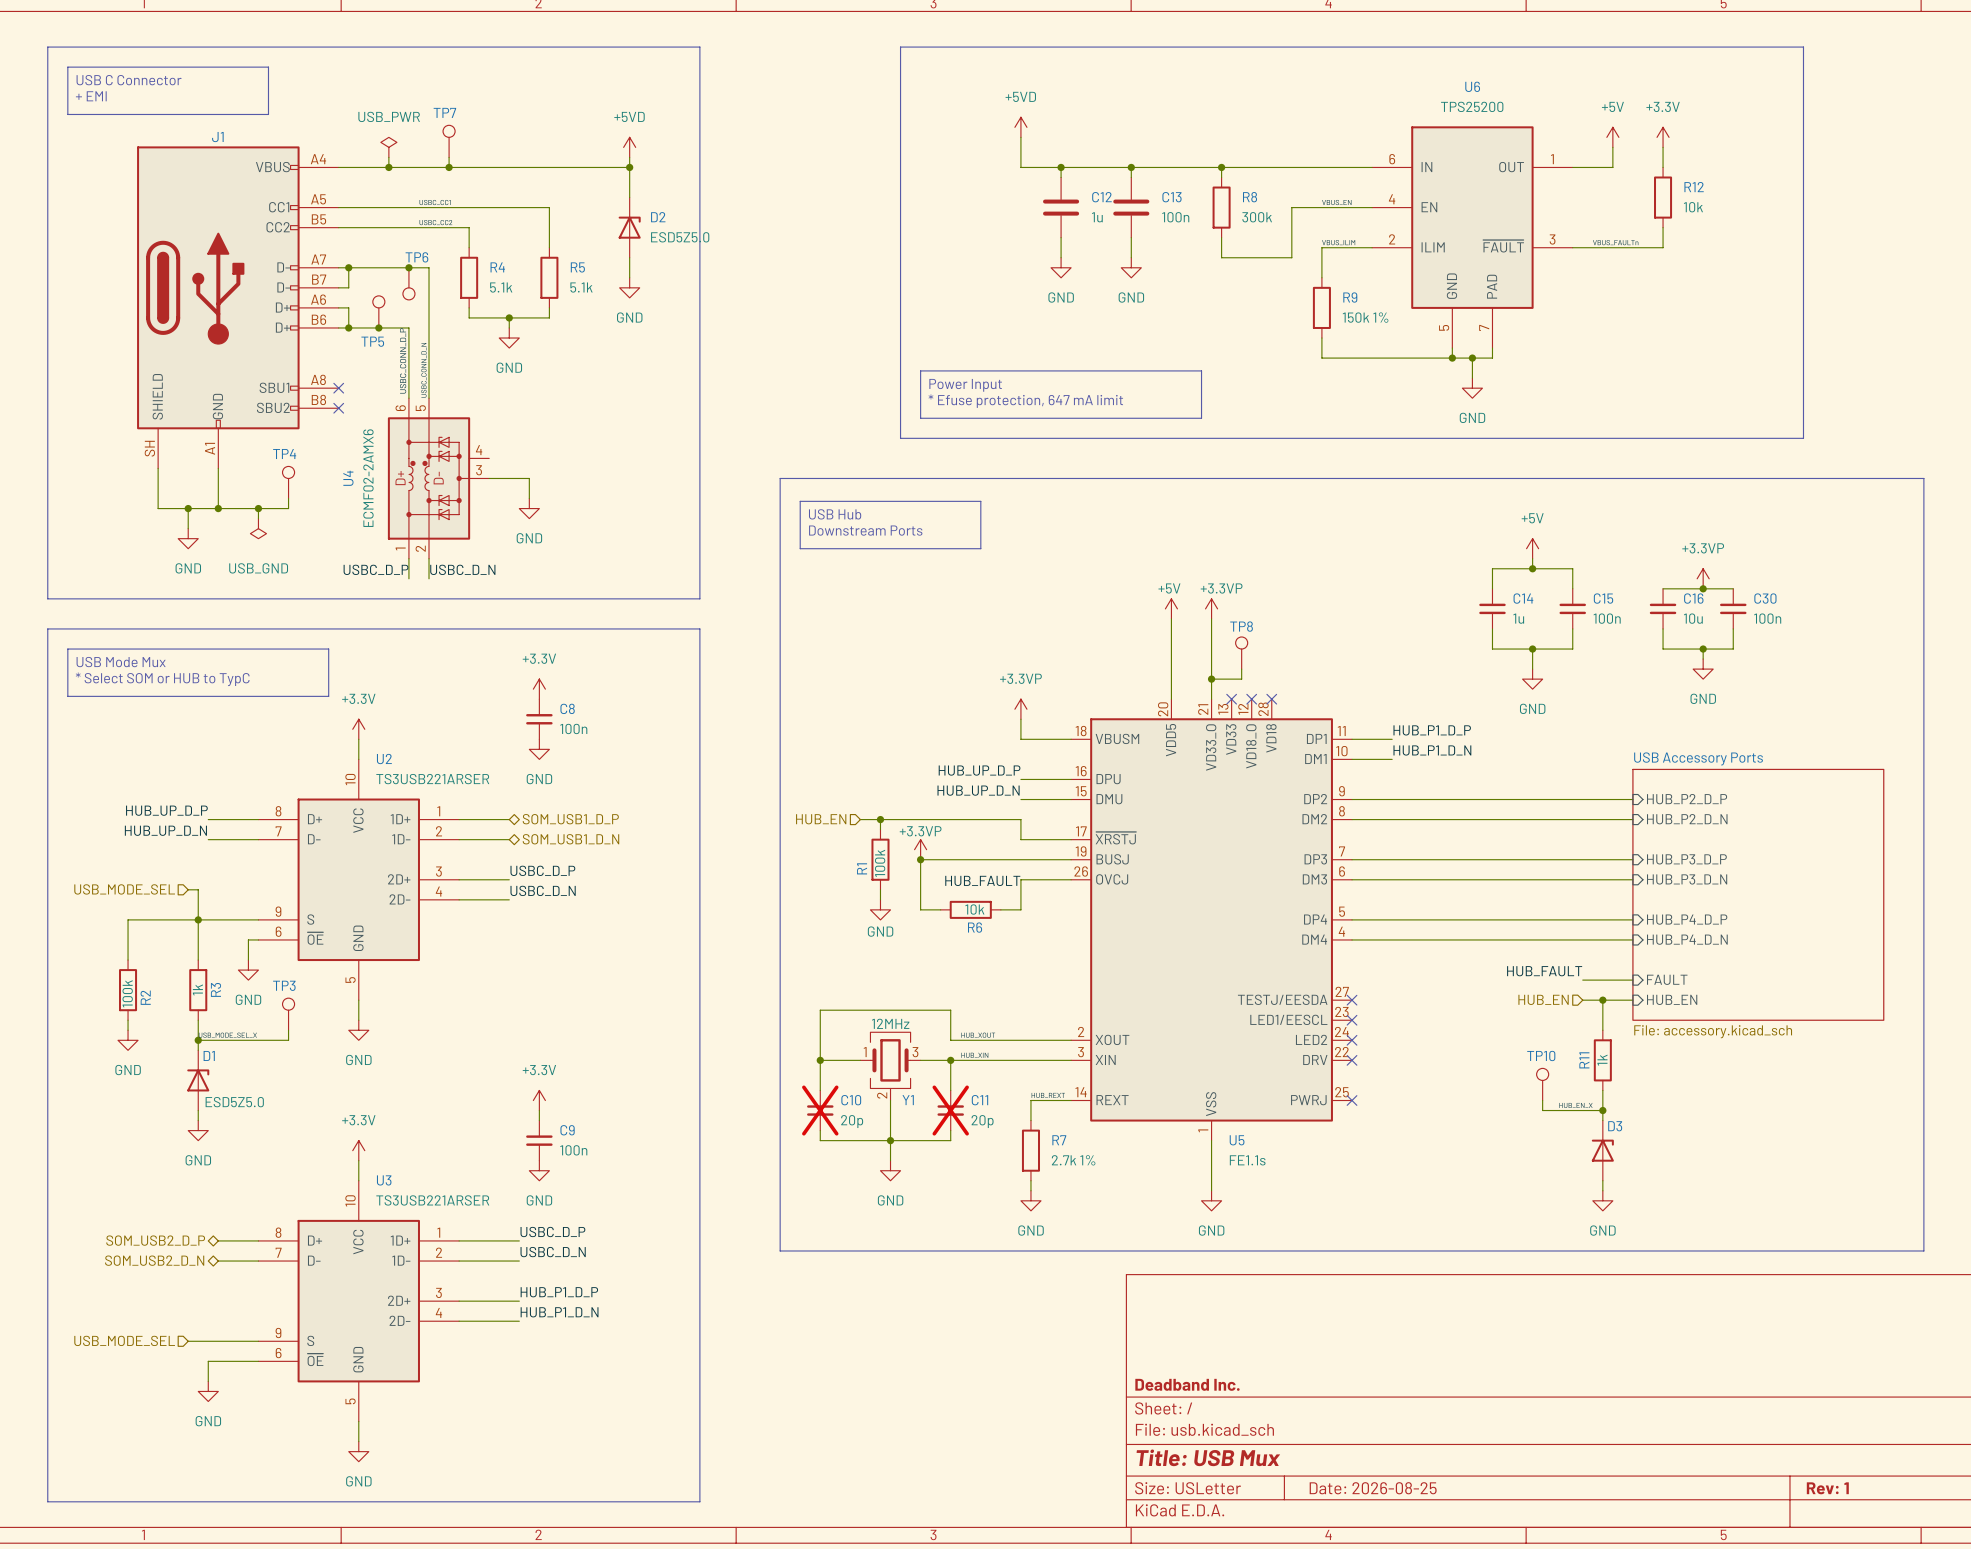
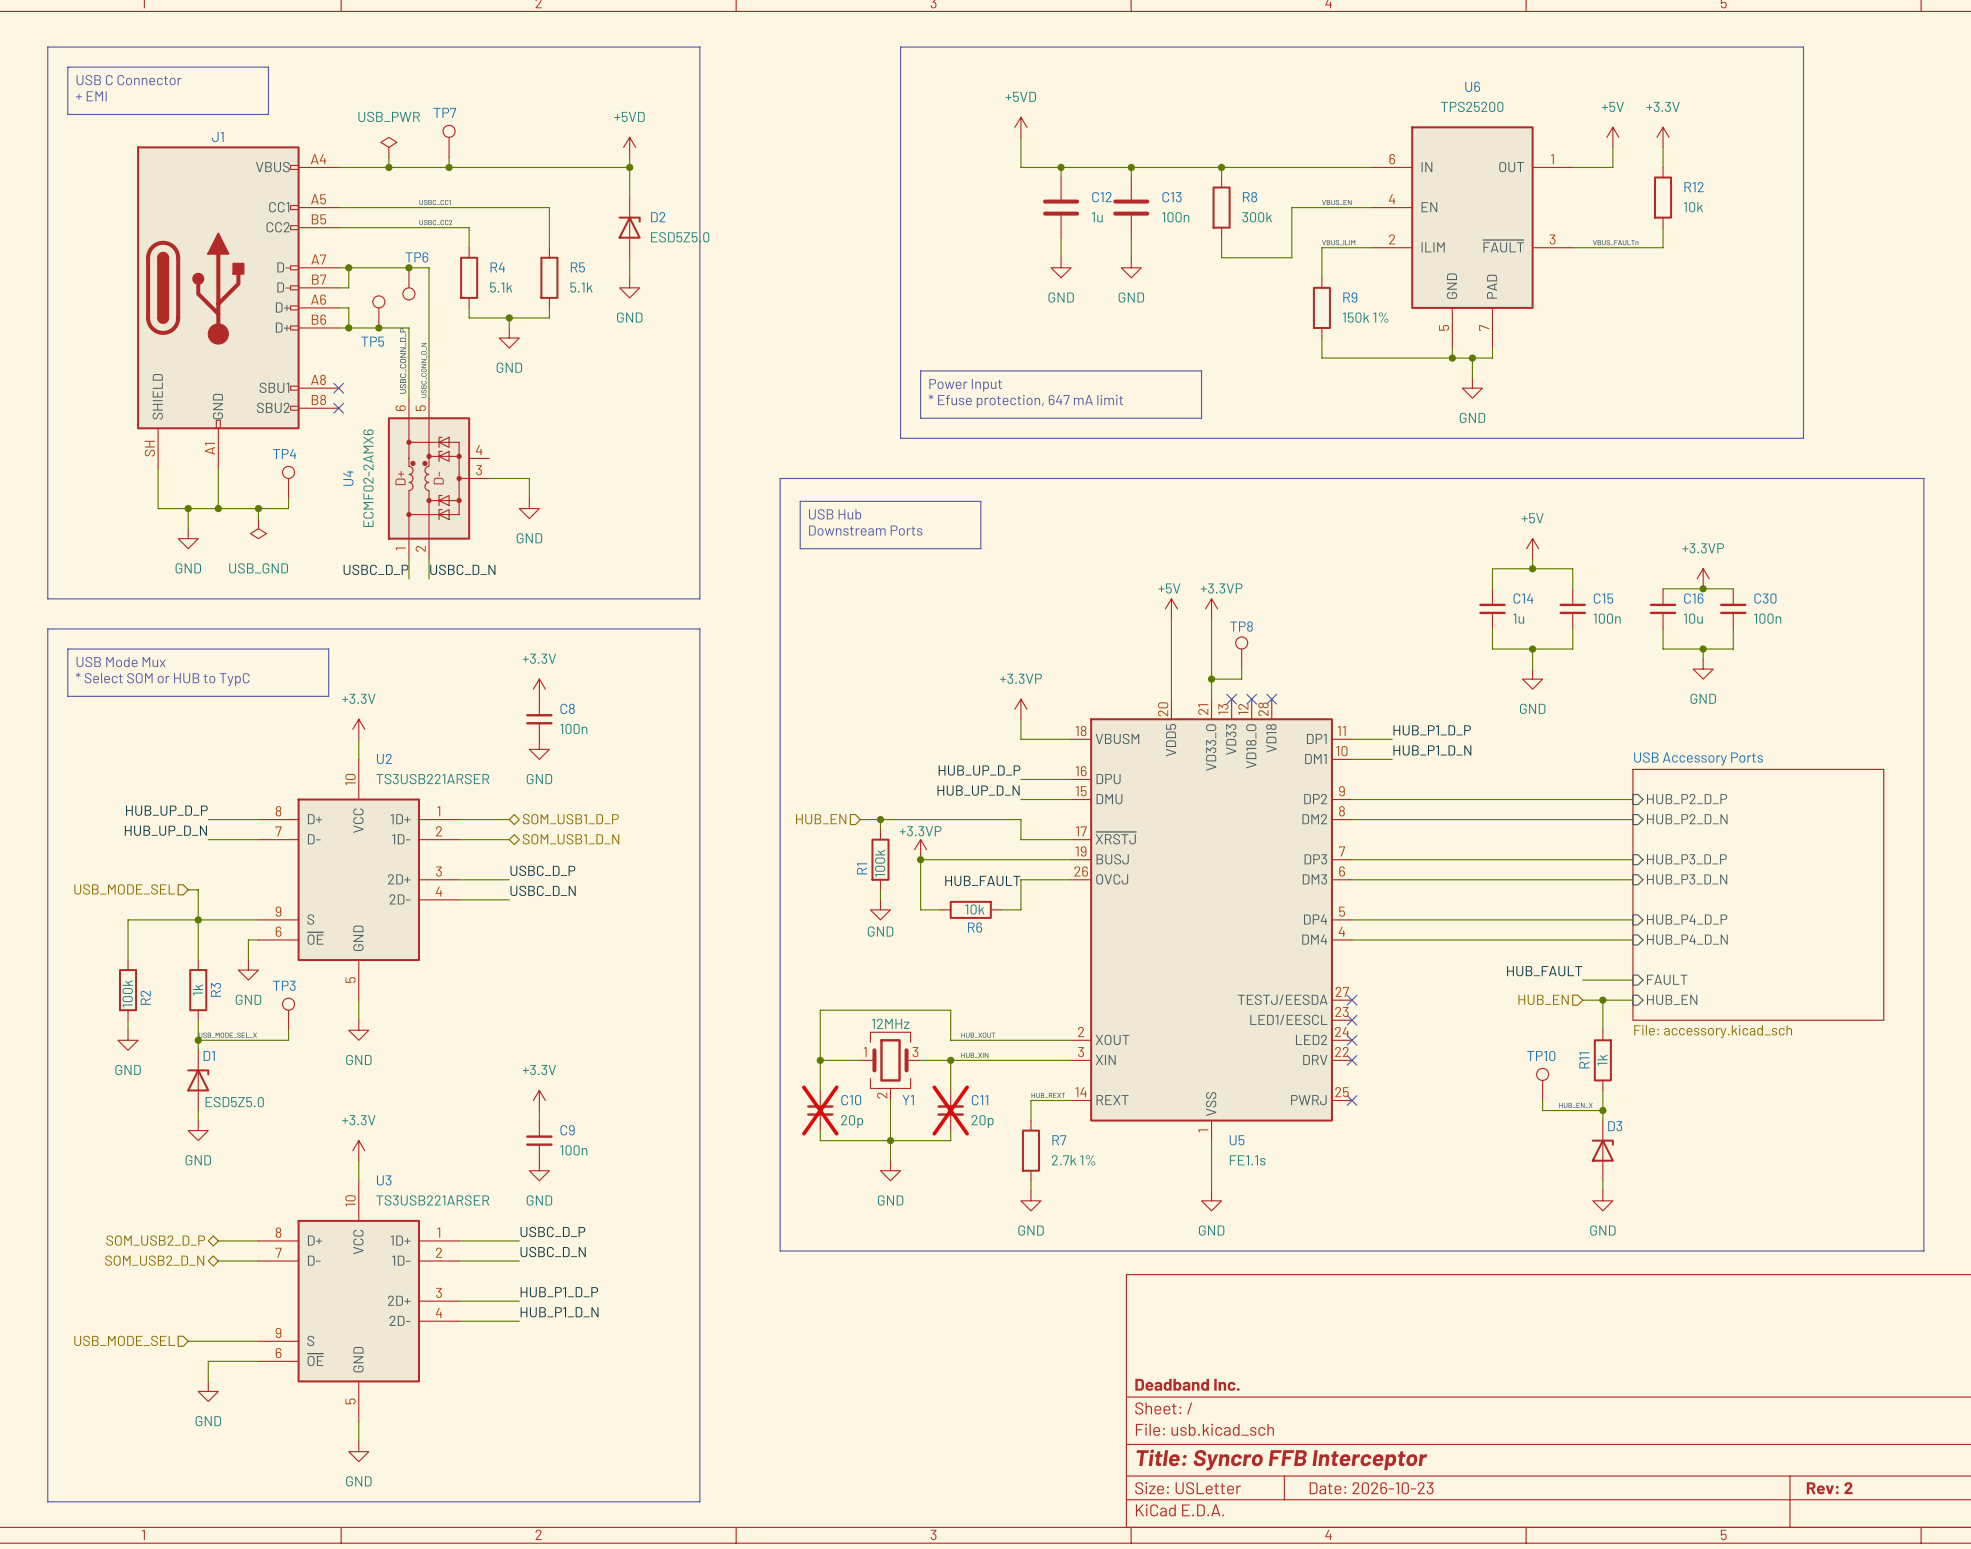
title block: Title: USB Mux (1208, 1457) -> Title: Syncro FFB Interceptor (1281, 1459)
title block: Date: 2026-08-25 (1373, 1488) -> Date: 2026-10-23 (1371, 1488)
title block: Rev: 1 (1827, 1488) -> Rev: 2 (1829, 1488)

